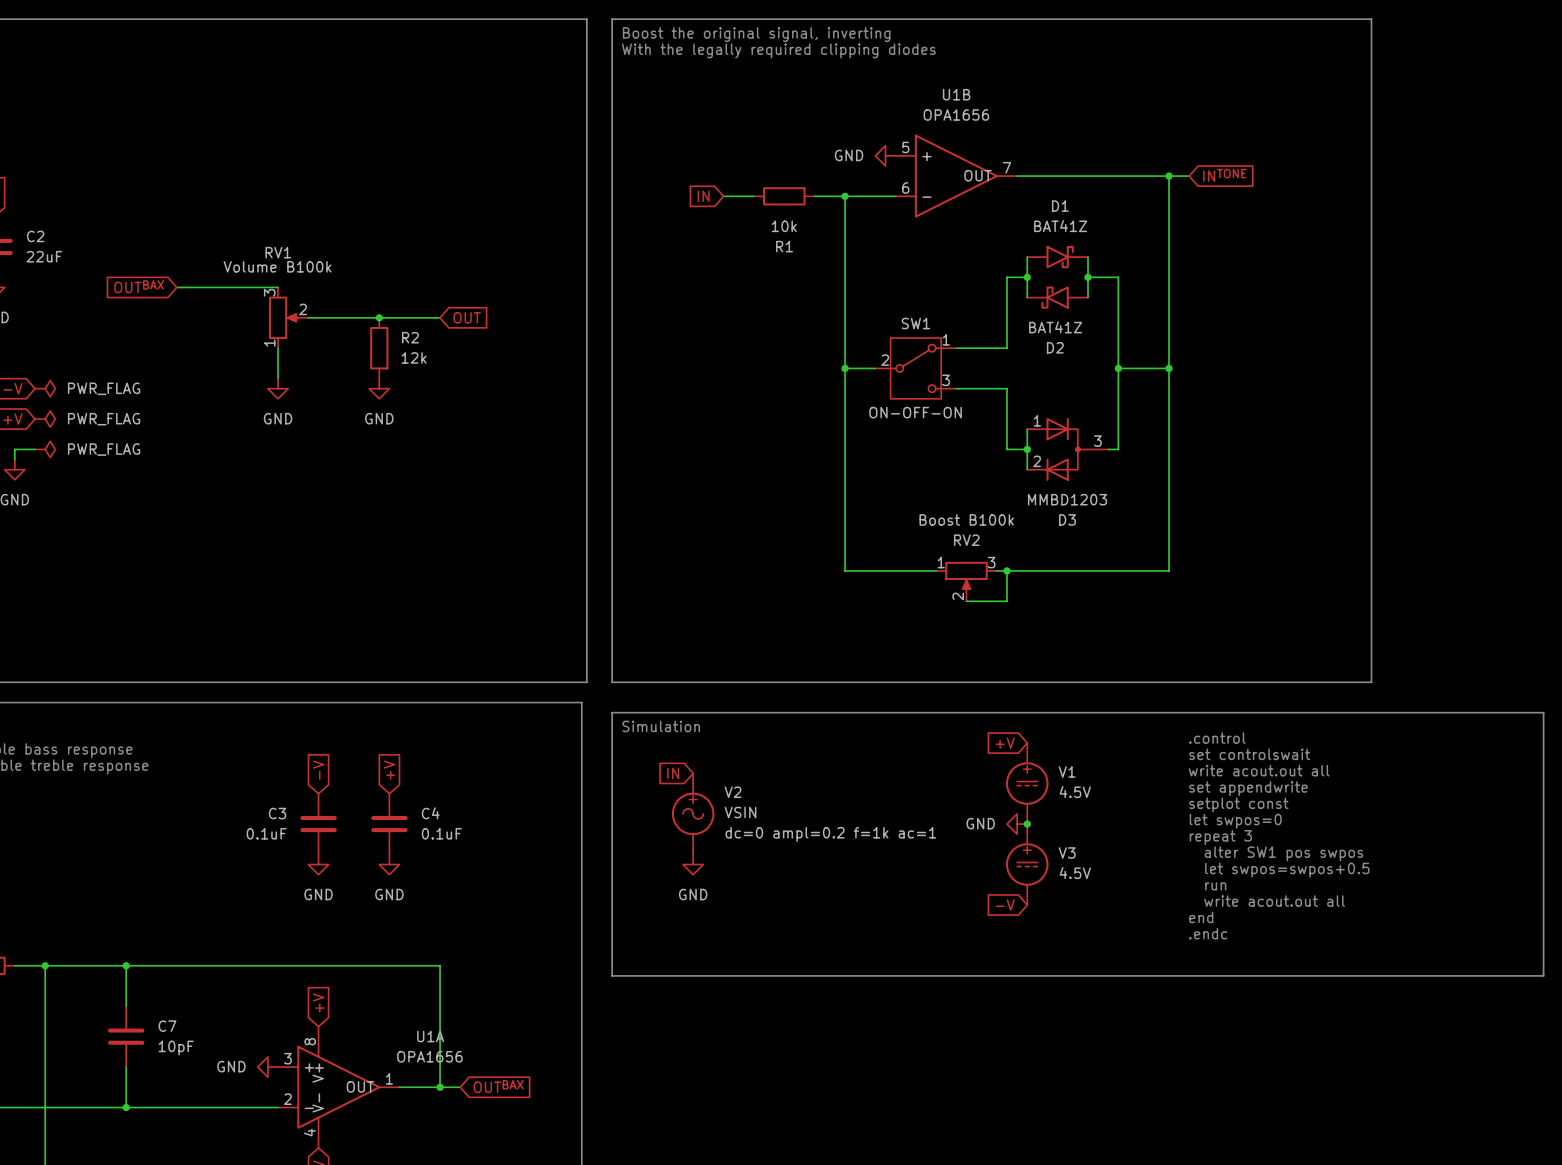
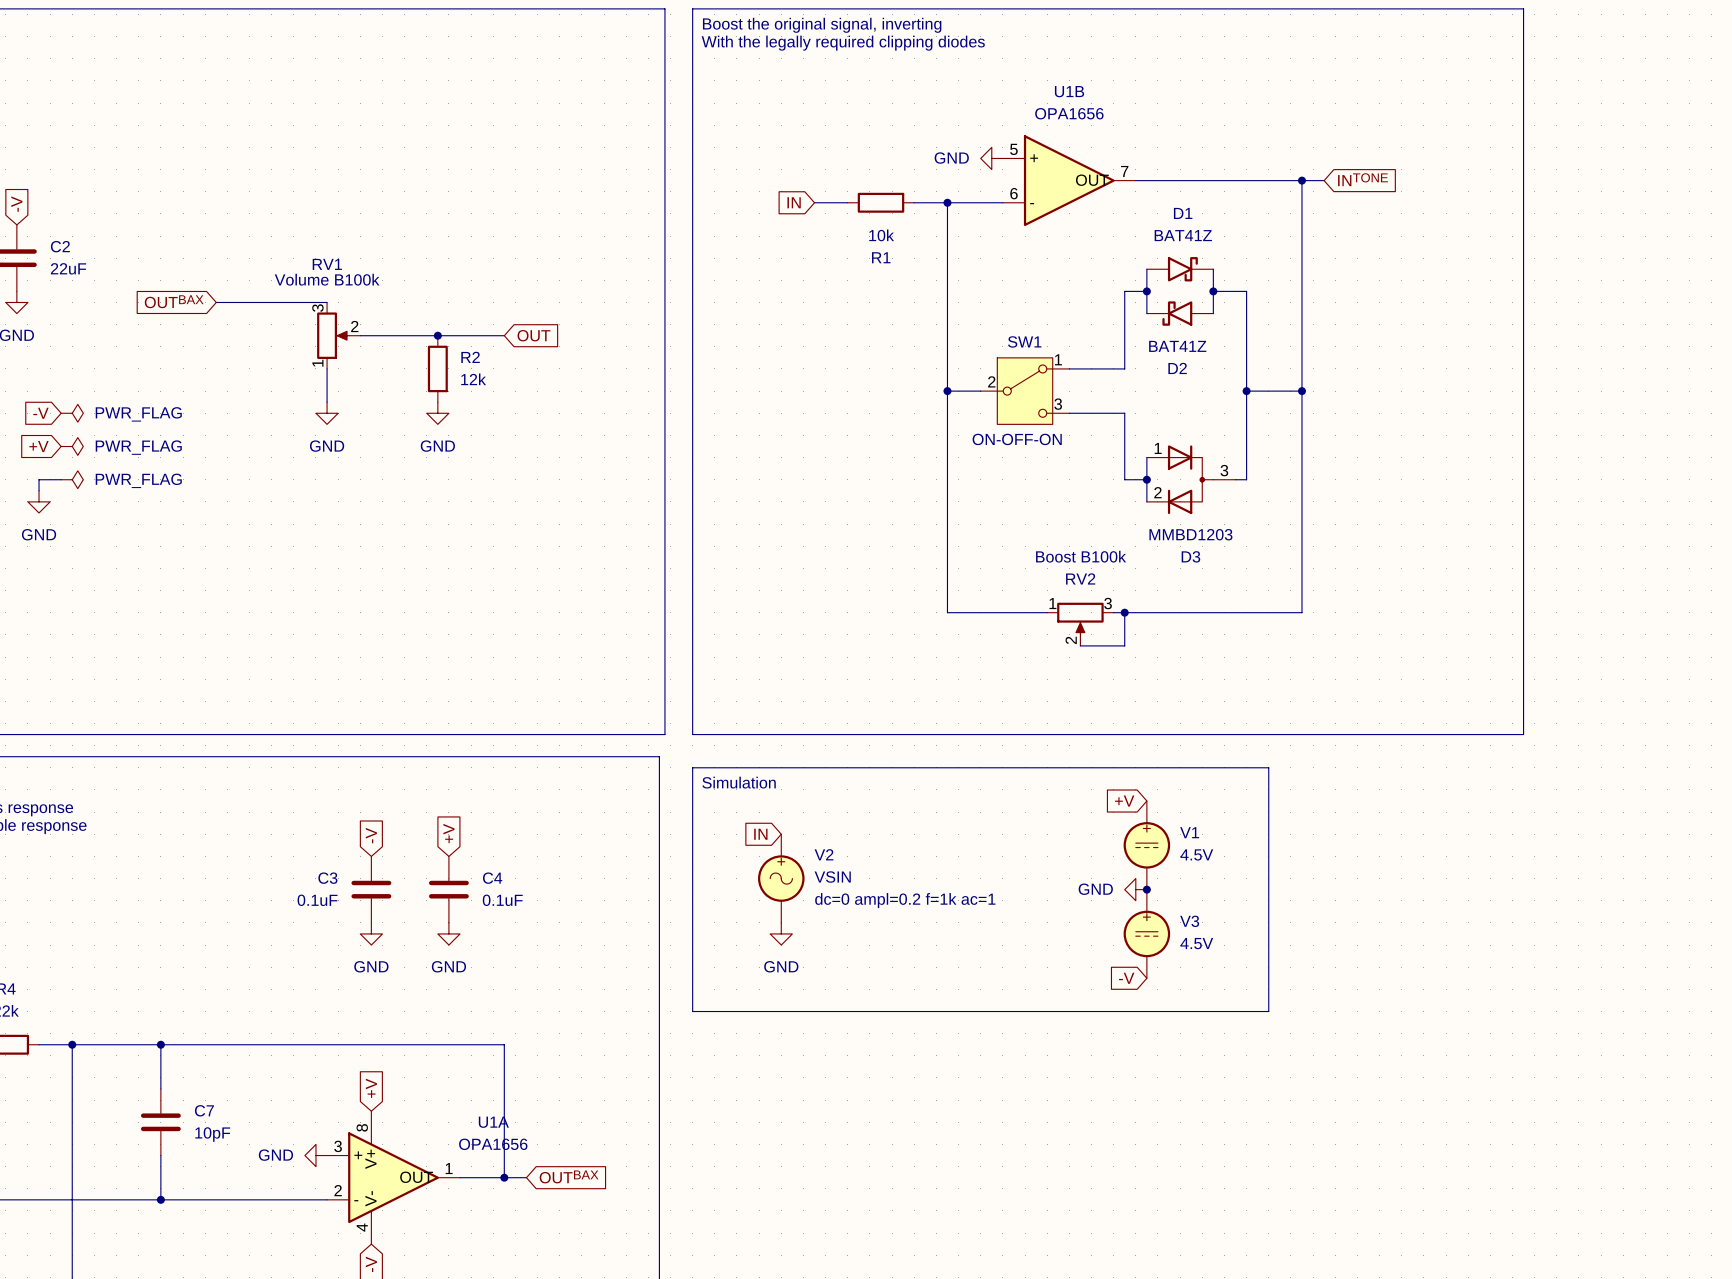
line: (1138, 712) (1543, 712) (1543, 975) (612, 975) (612, 935) -> (1268, 767) (1268, 1011) (692, 1011)
text: .control (1217, 738) -> none
text: set controlswait (1249, 754) -> none
text: write acout.out all (1259, 770) -> none
text: set appendwrite (1248, 788) -> none
text: setplot const (1238, 804) -> none
text: let swpos=0 (1235, 821) -> none
text: repeat 3 (1220, 837) -> none
text: alter SW1 pos swpos (1283, 853) -> none
text: let swpos=swpos+0.5 (1287, 870) -> none
text: run (1215, 886) -> none
text: write acout.out all (1274, 901) -> none
text: end (1201, 917) -> none
text: .endc (1208, 933) -> none

